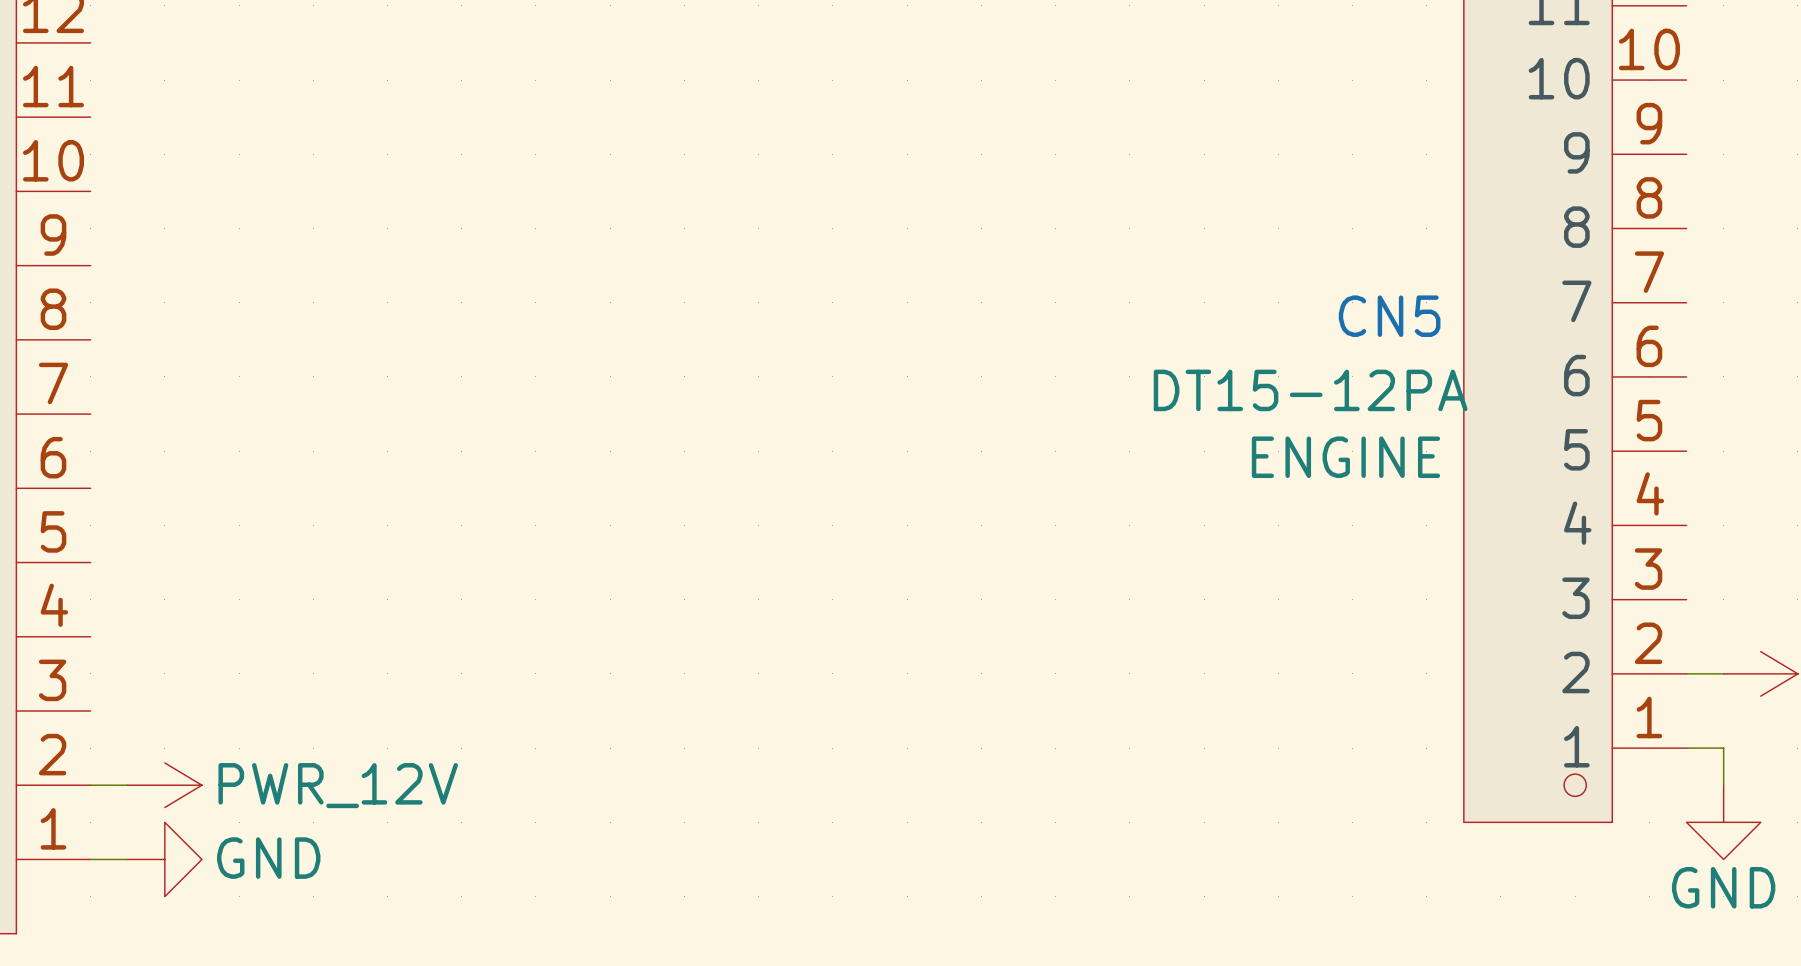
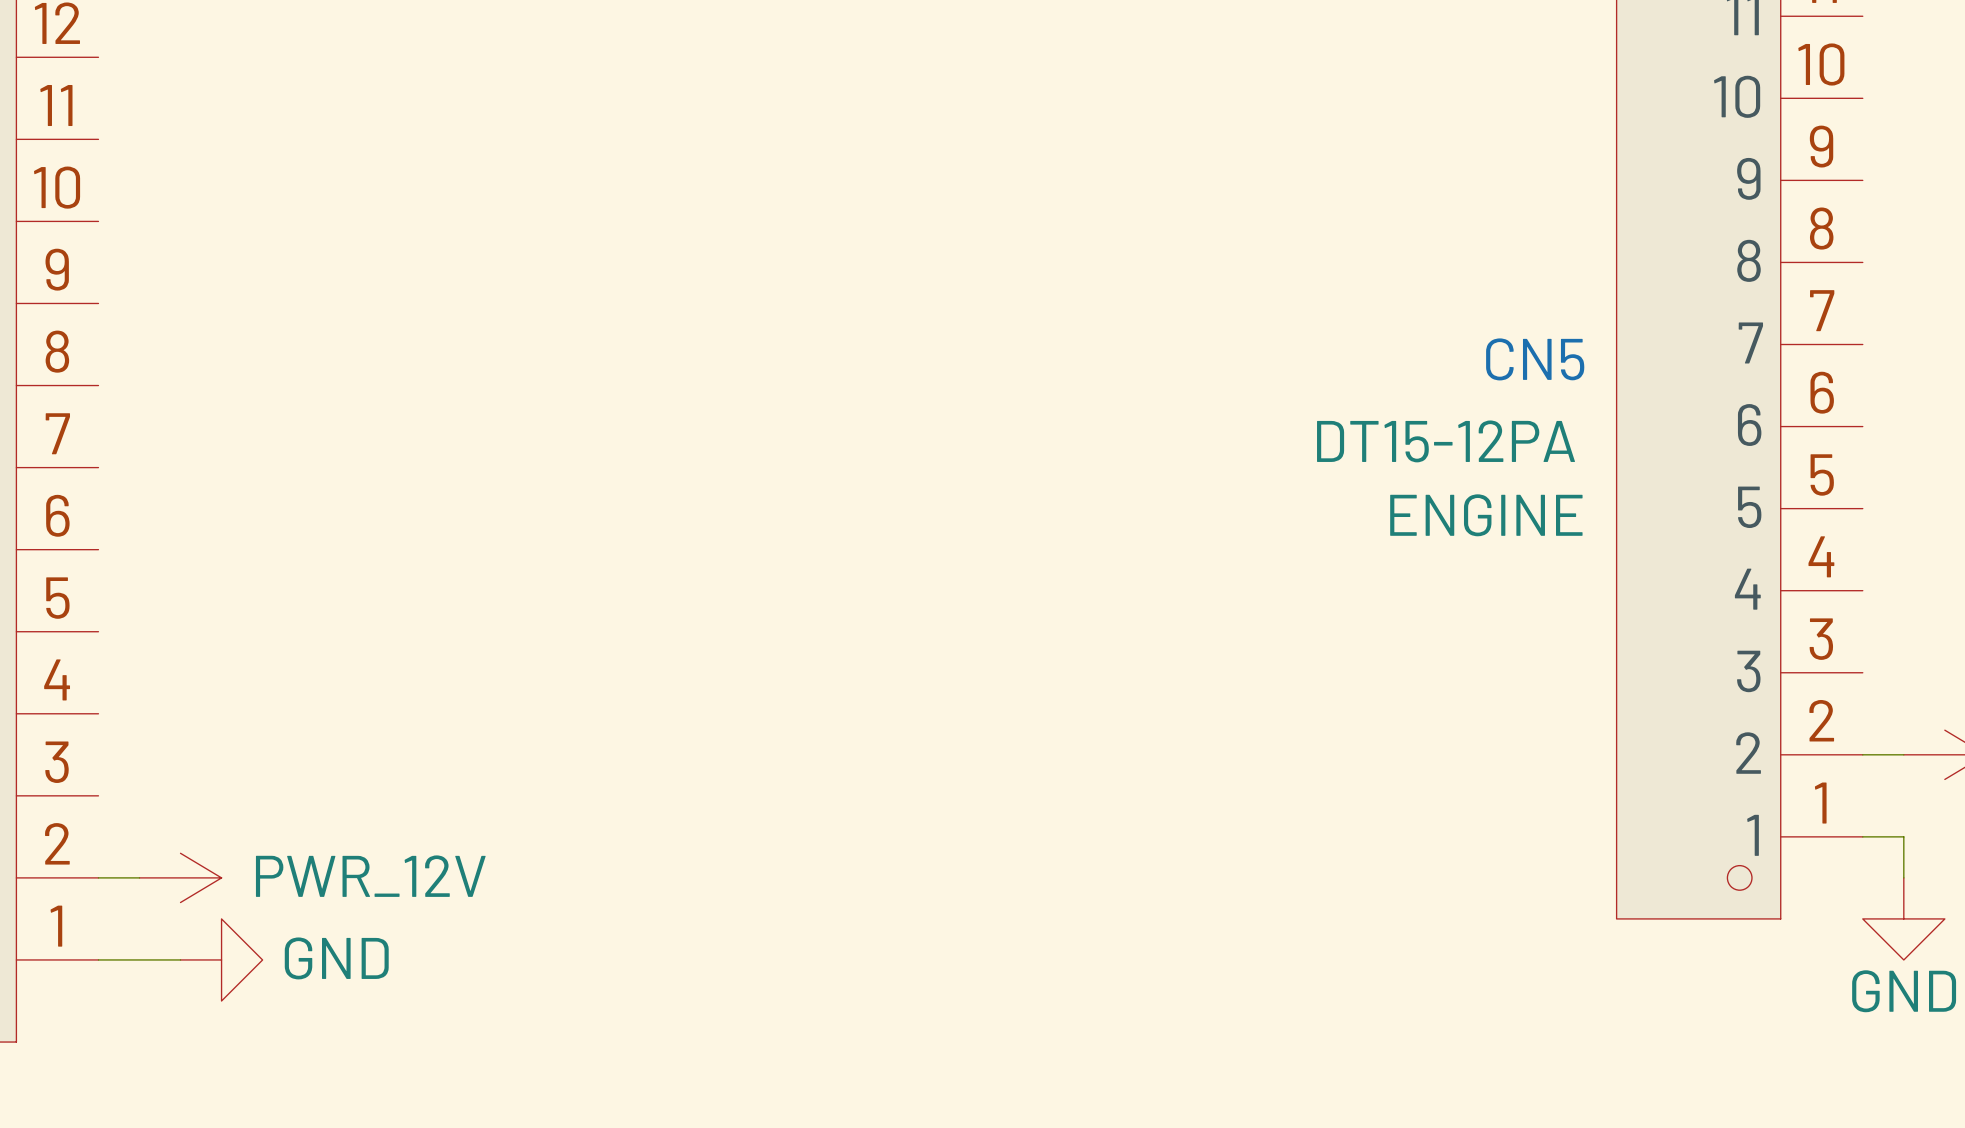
power symbol position: GND (164, 859) -> GND (221, 959)

